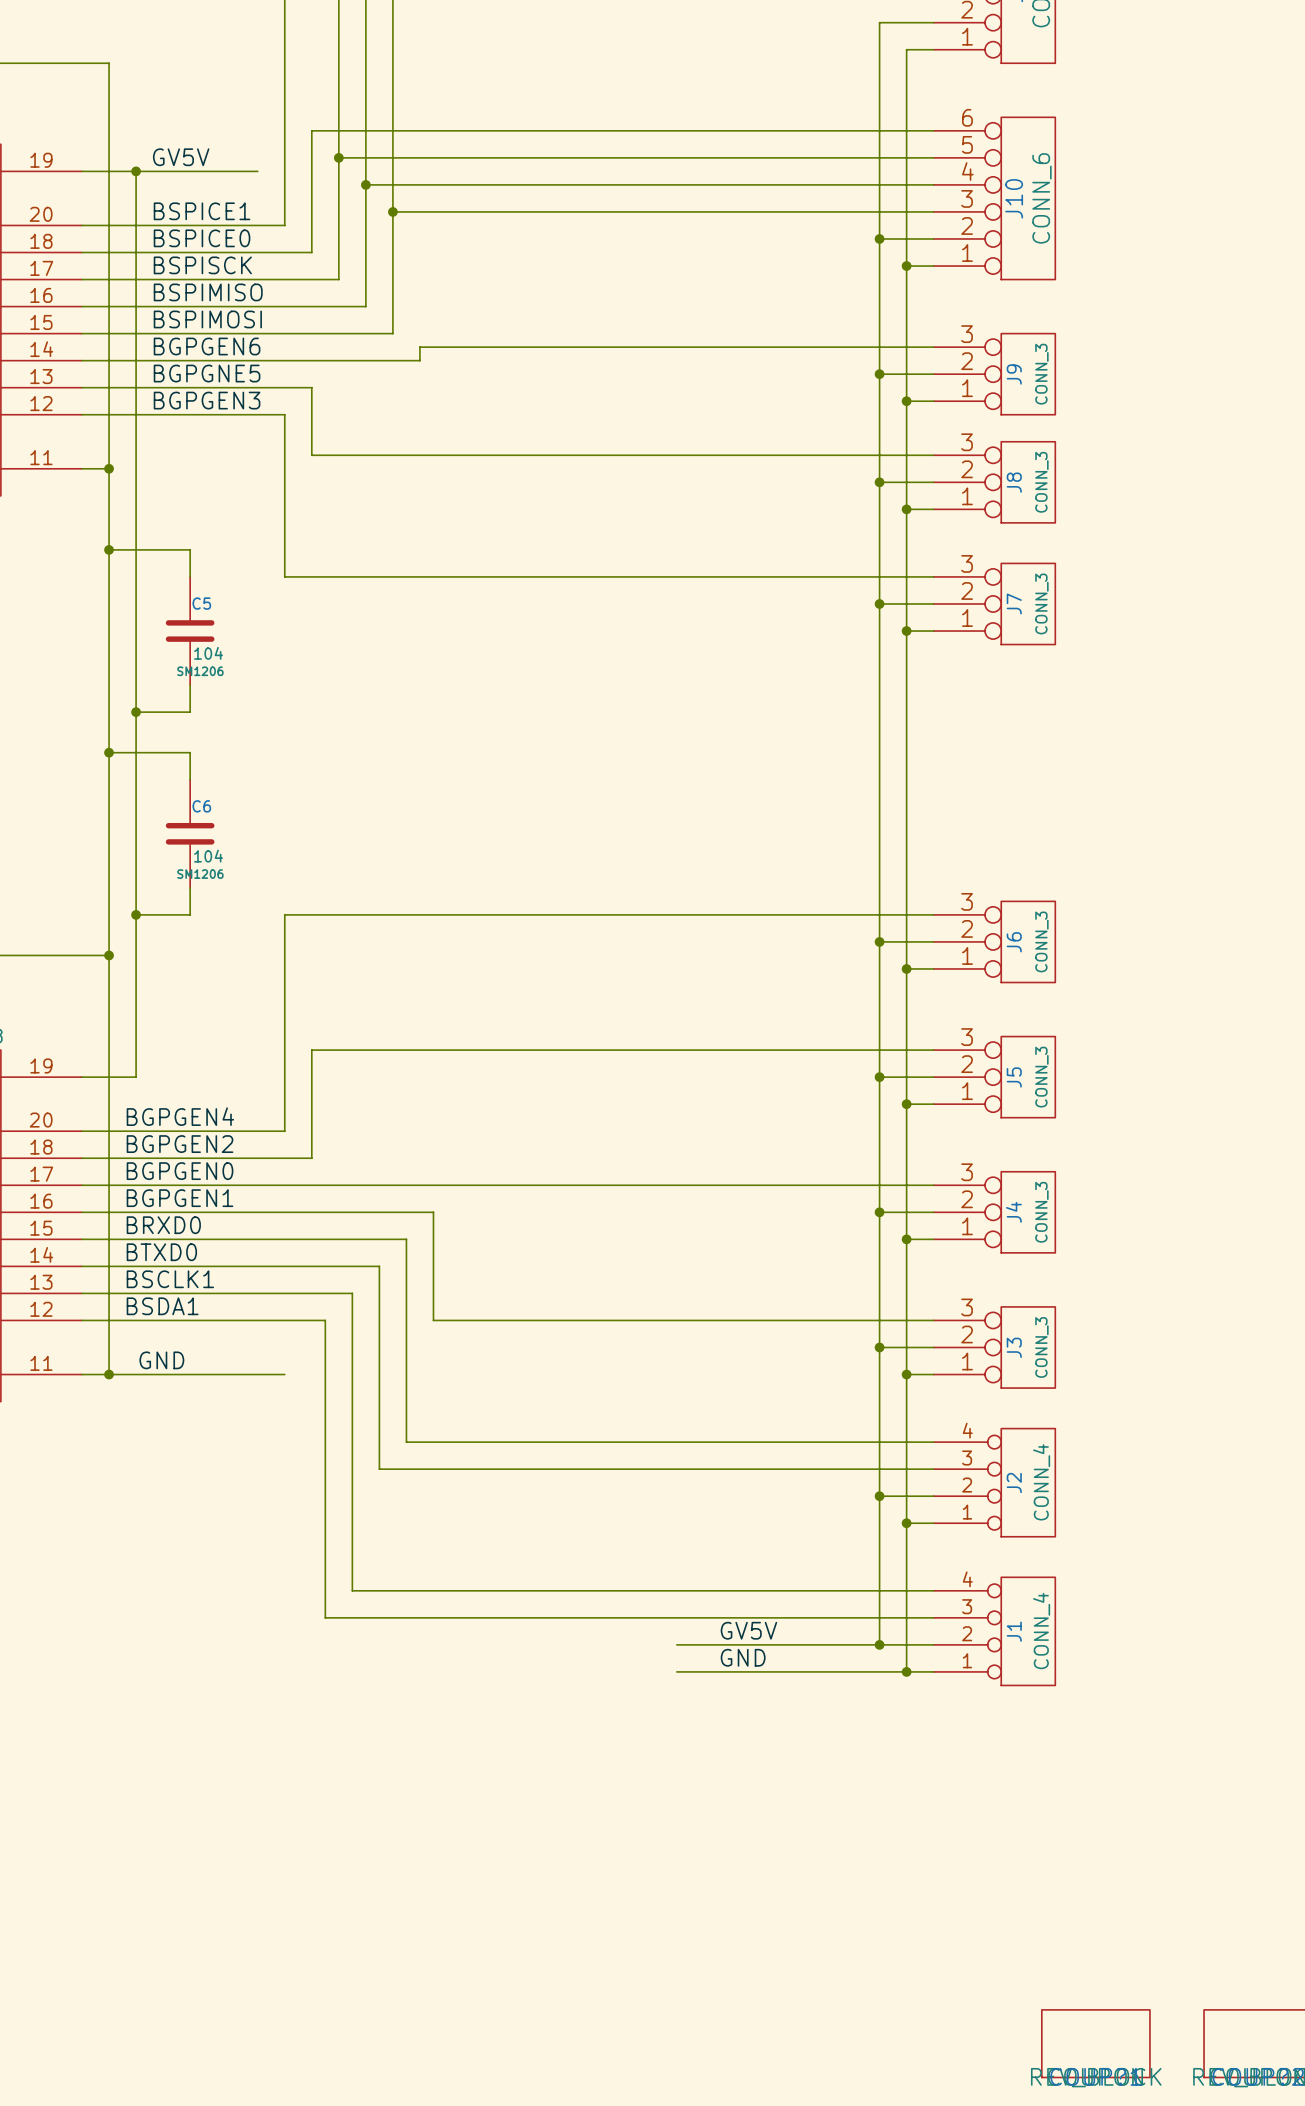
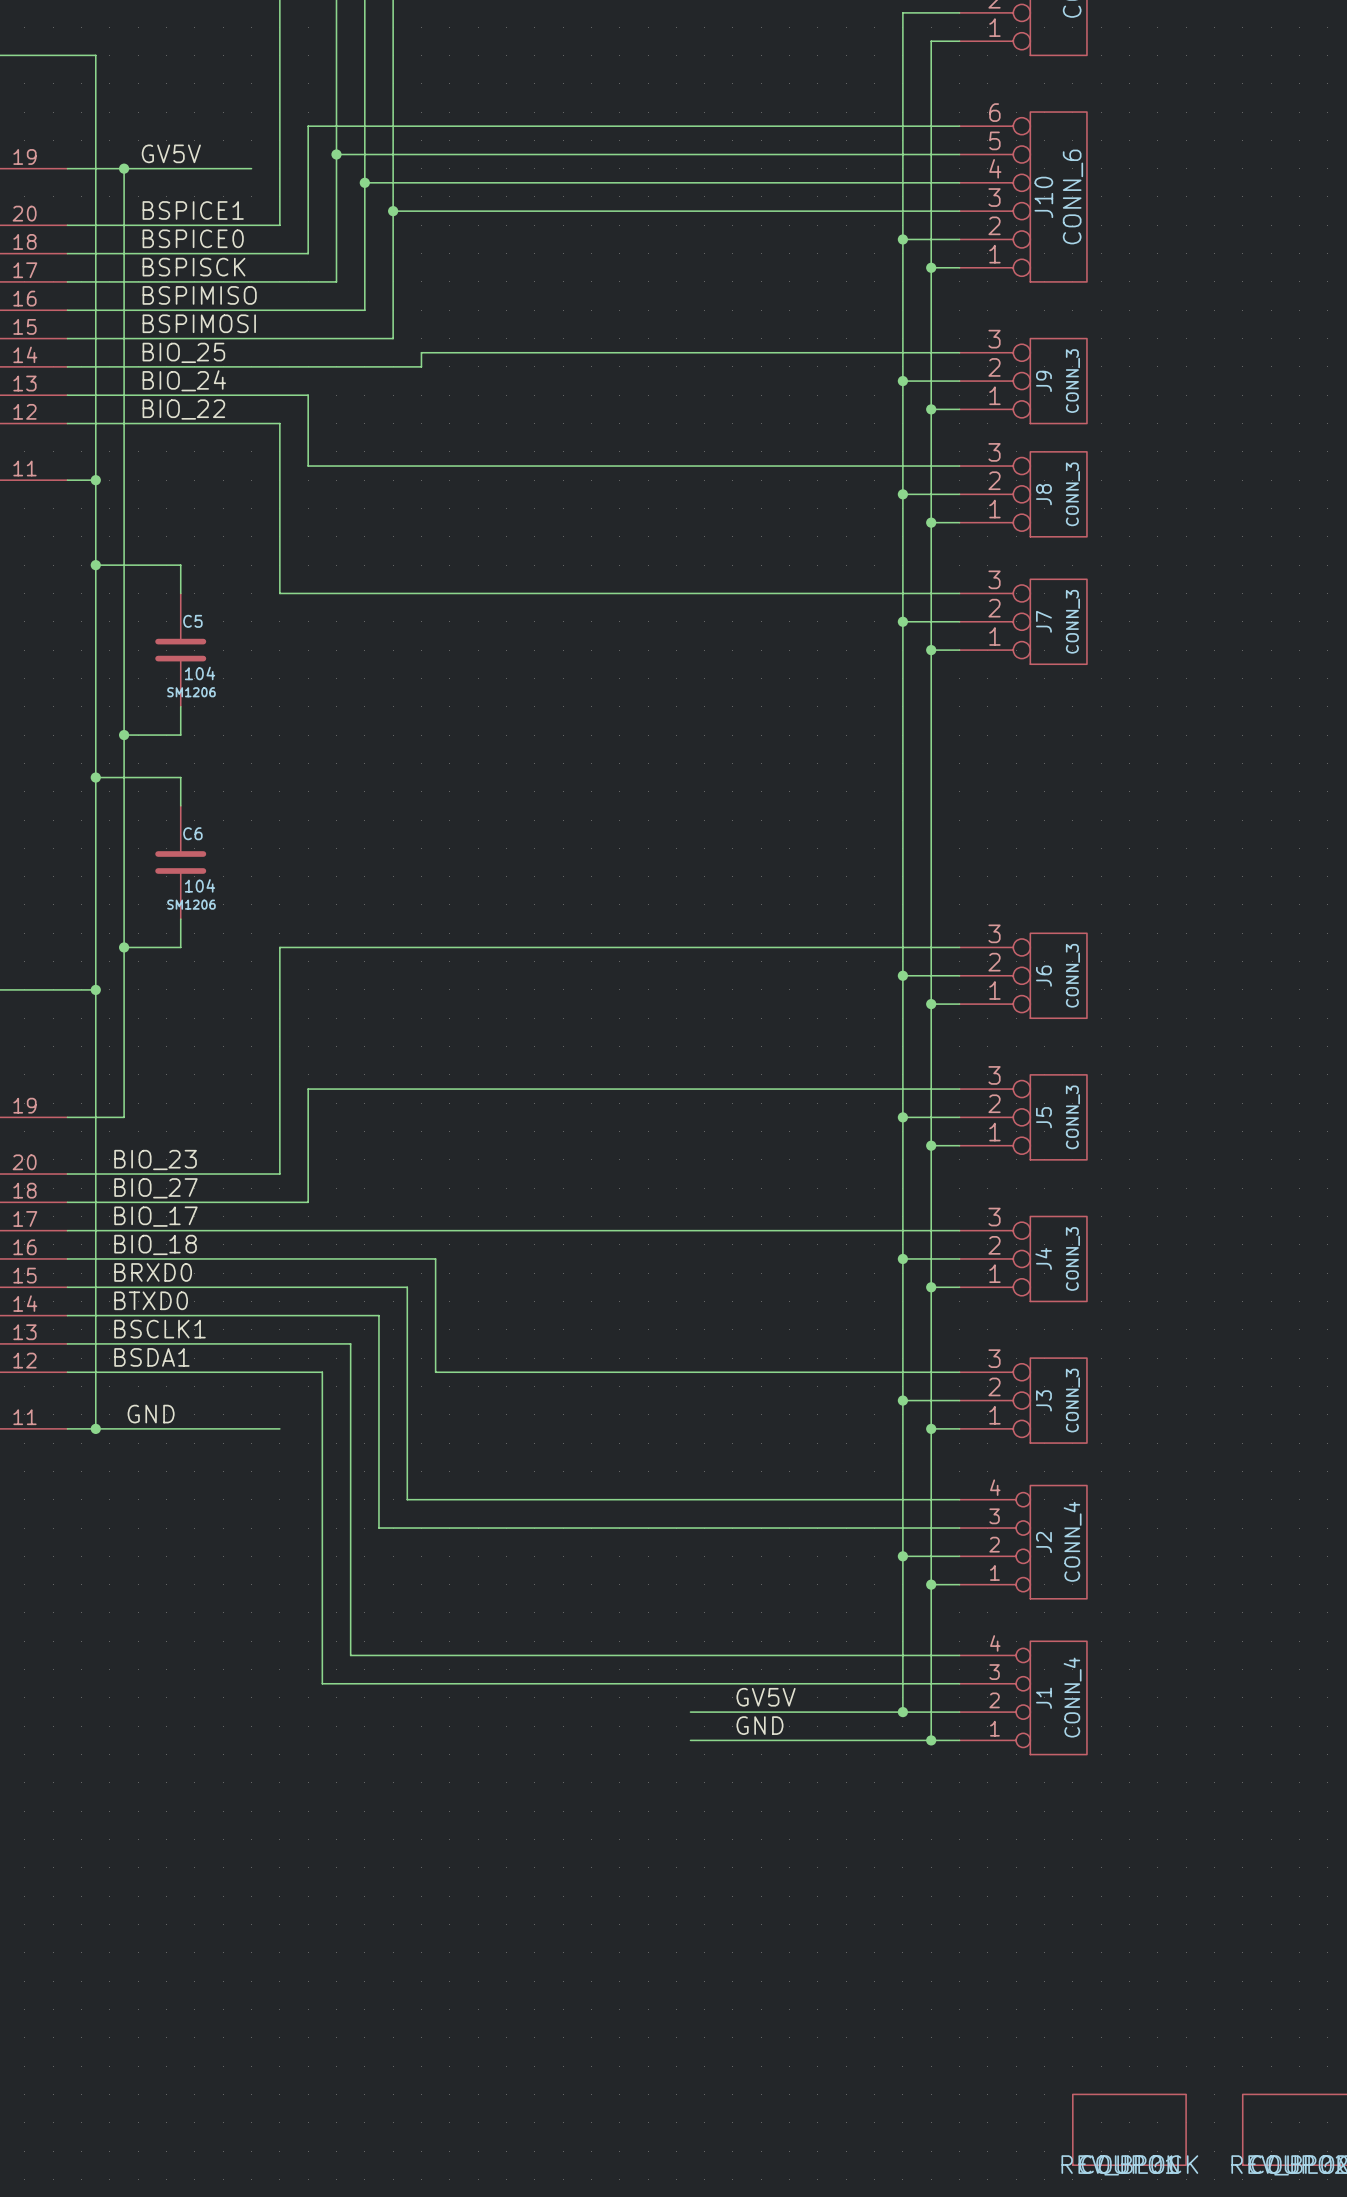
label: BGPGEN6 (207, 346) -> BIO_25 (183, 352)
label: BGPGNE5 (207, 373) -> BIO_24 (184, 380)
label: BGPGEN3 (207, 400) -> BIO_22 (183, 409)
label: BGPGEN4 (180, 1116) -> BIO_23 (155, 1160)
label: BGPGEN2 (180, 1144) -> BIO_27 (155, 1188)
label: BGPGEN0 (180, 1171) -> BIO_17 (155, 1216)
label: BGPGEN1 (180, 1198) -> BIO_18 (155, 1244)

